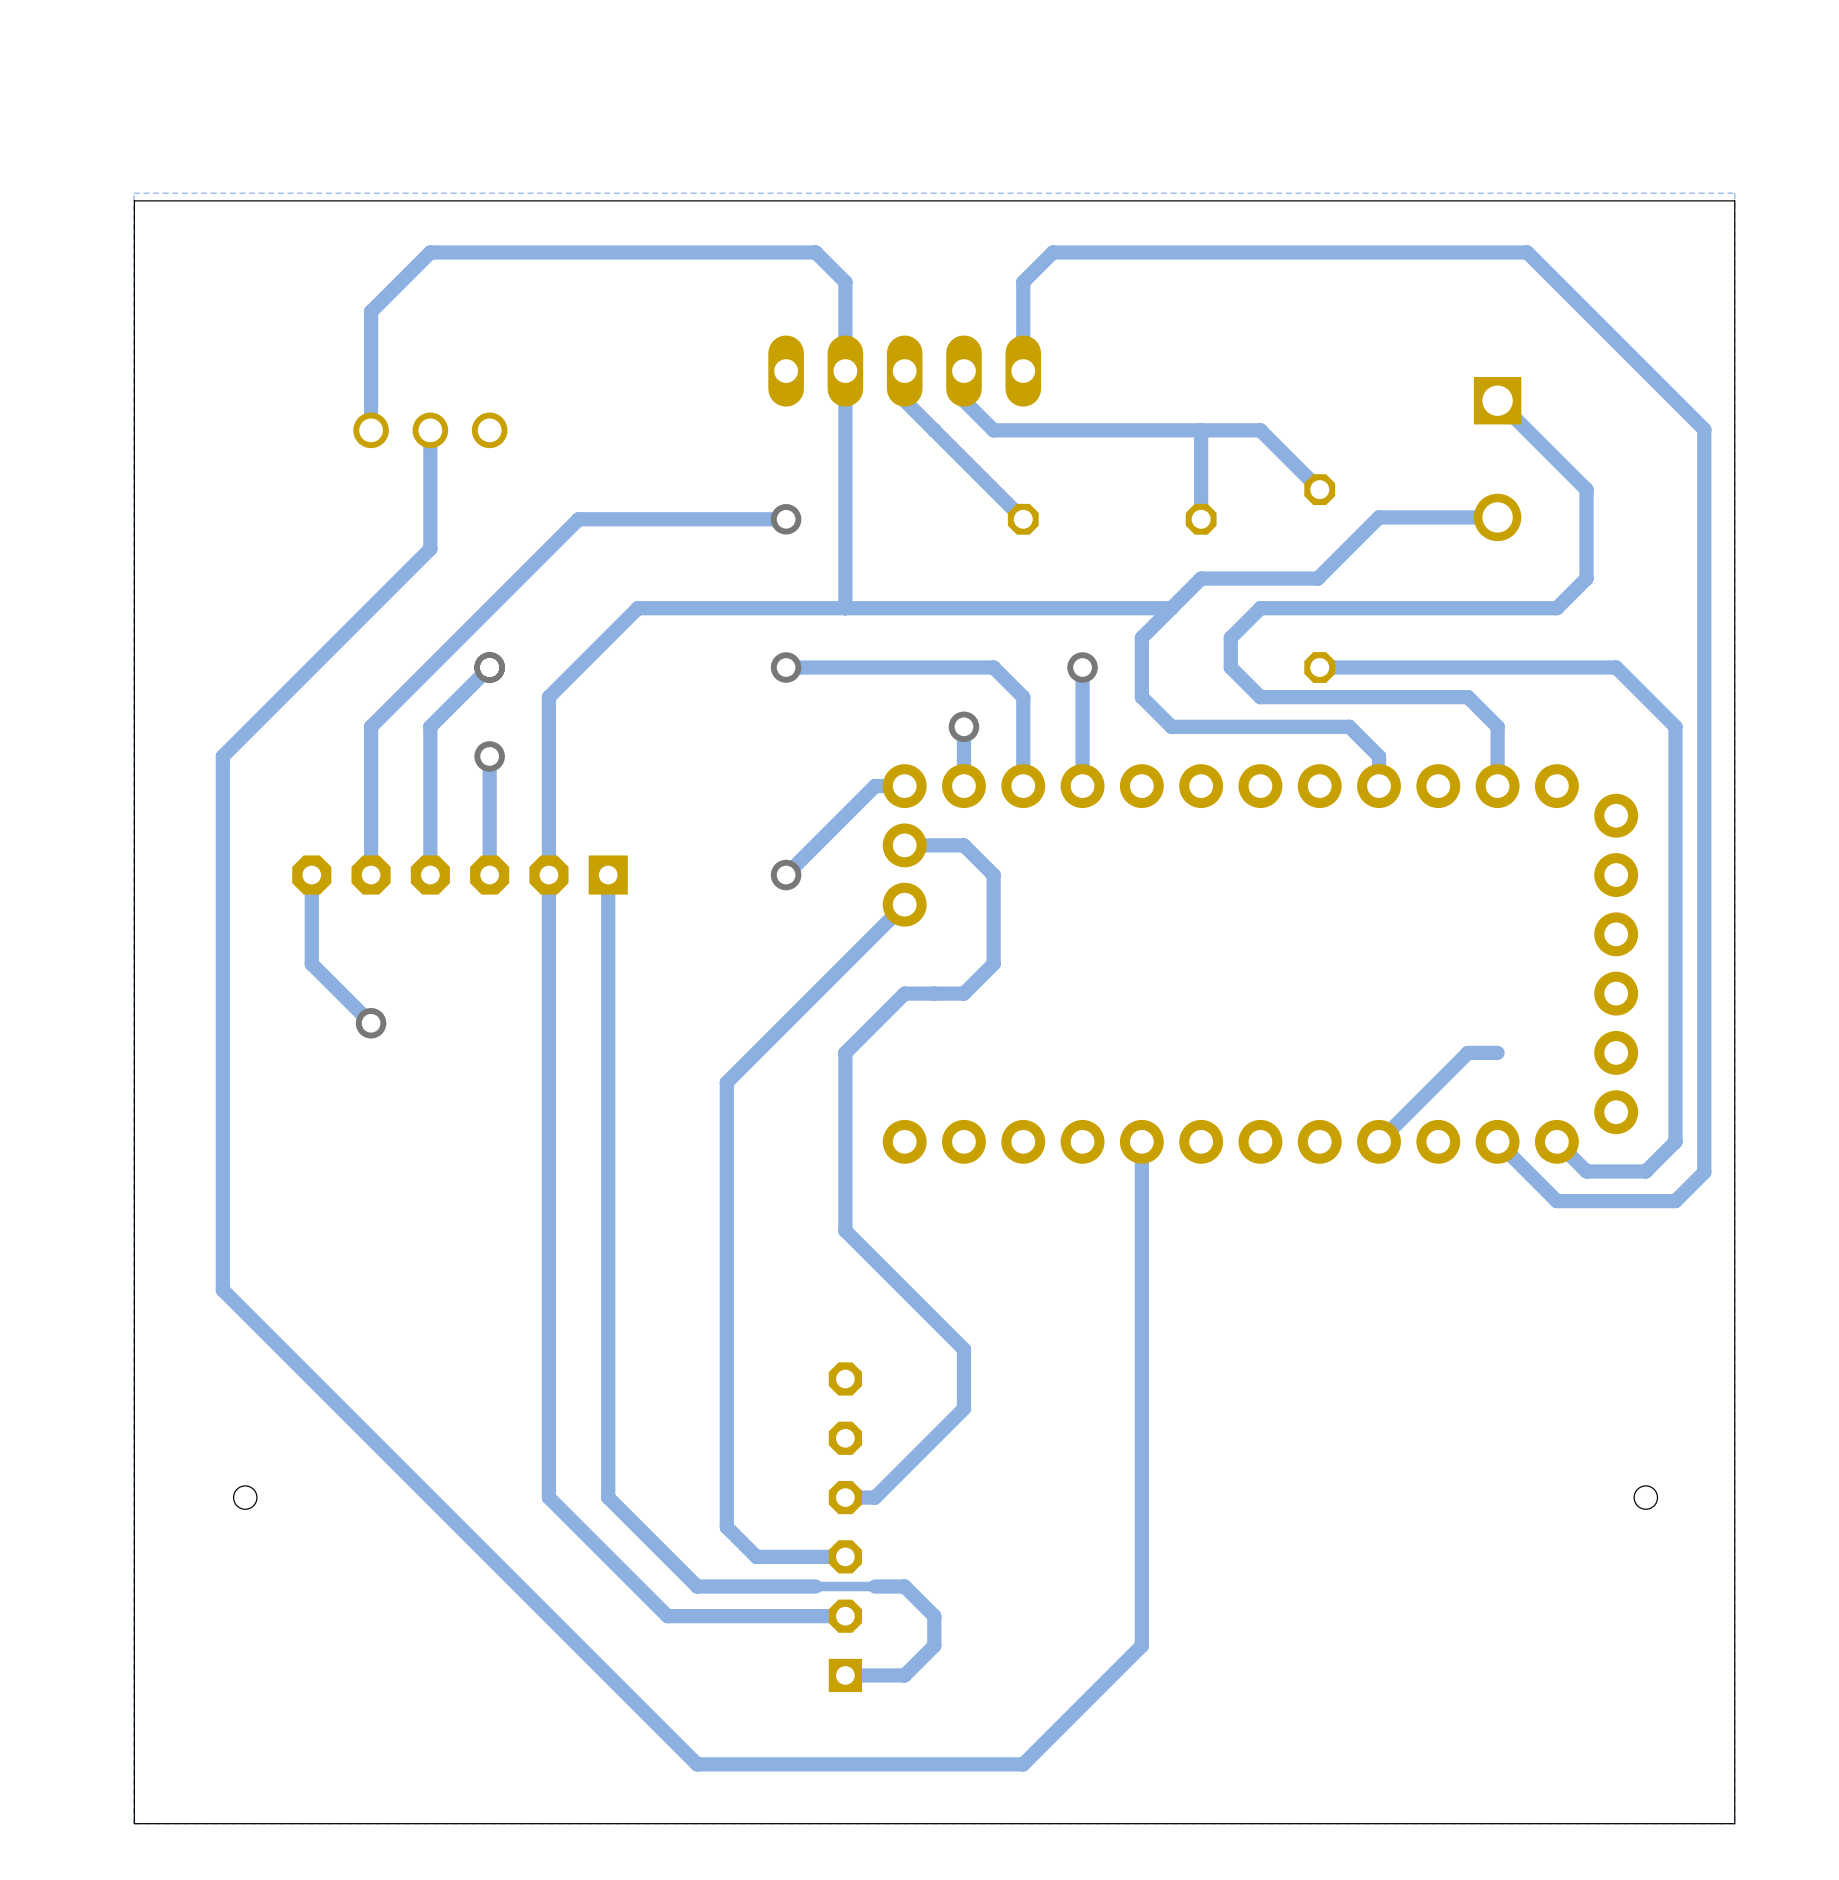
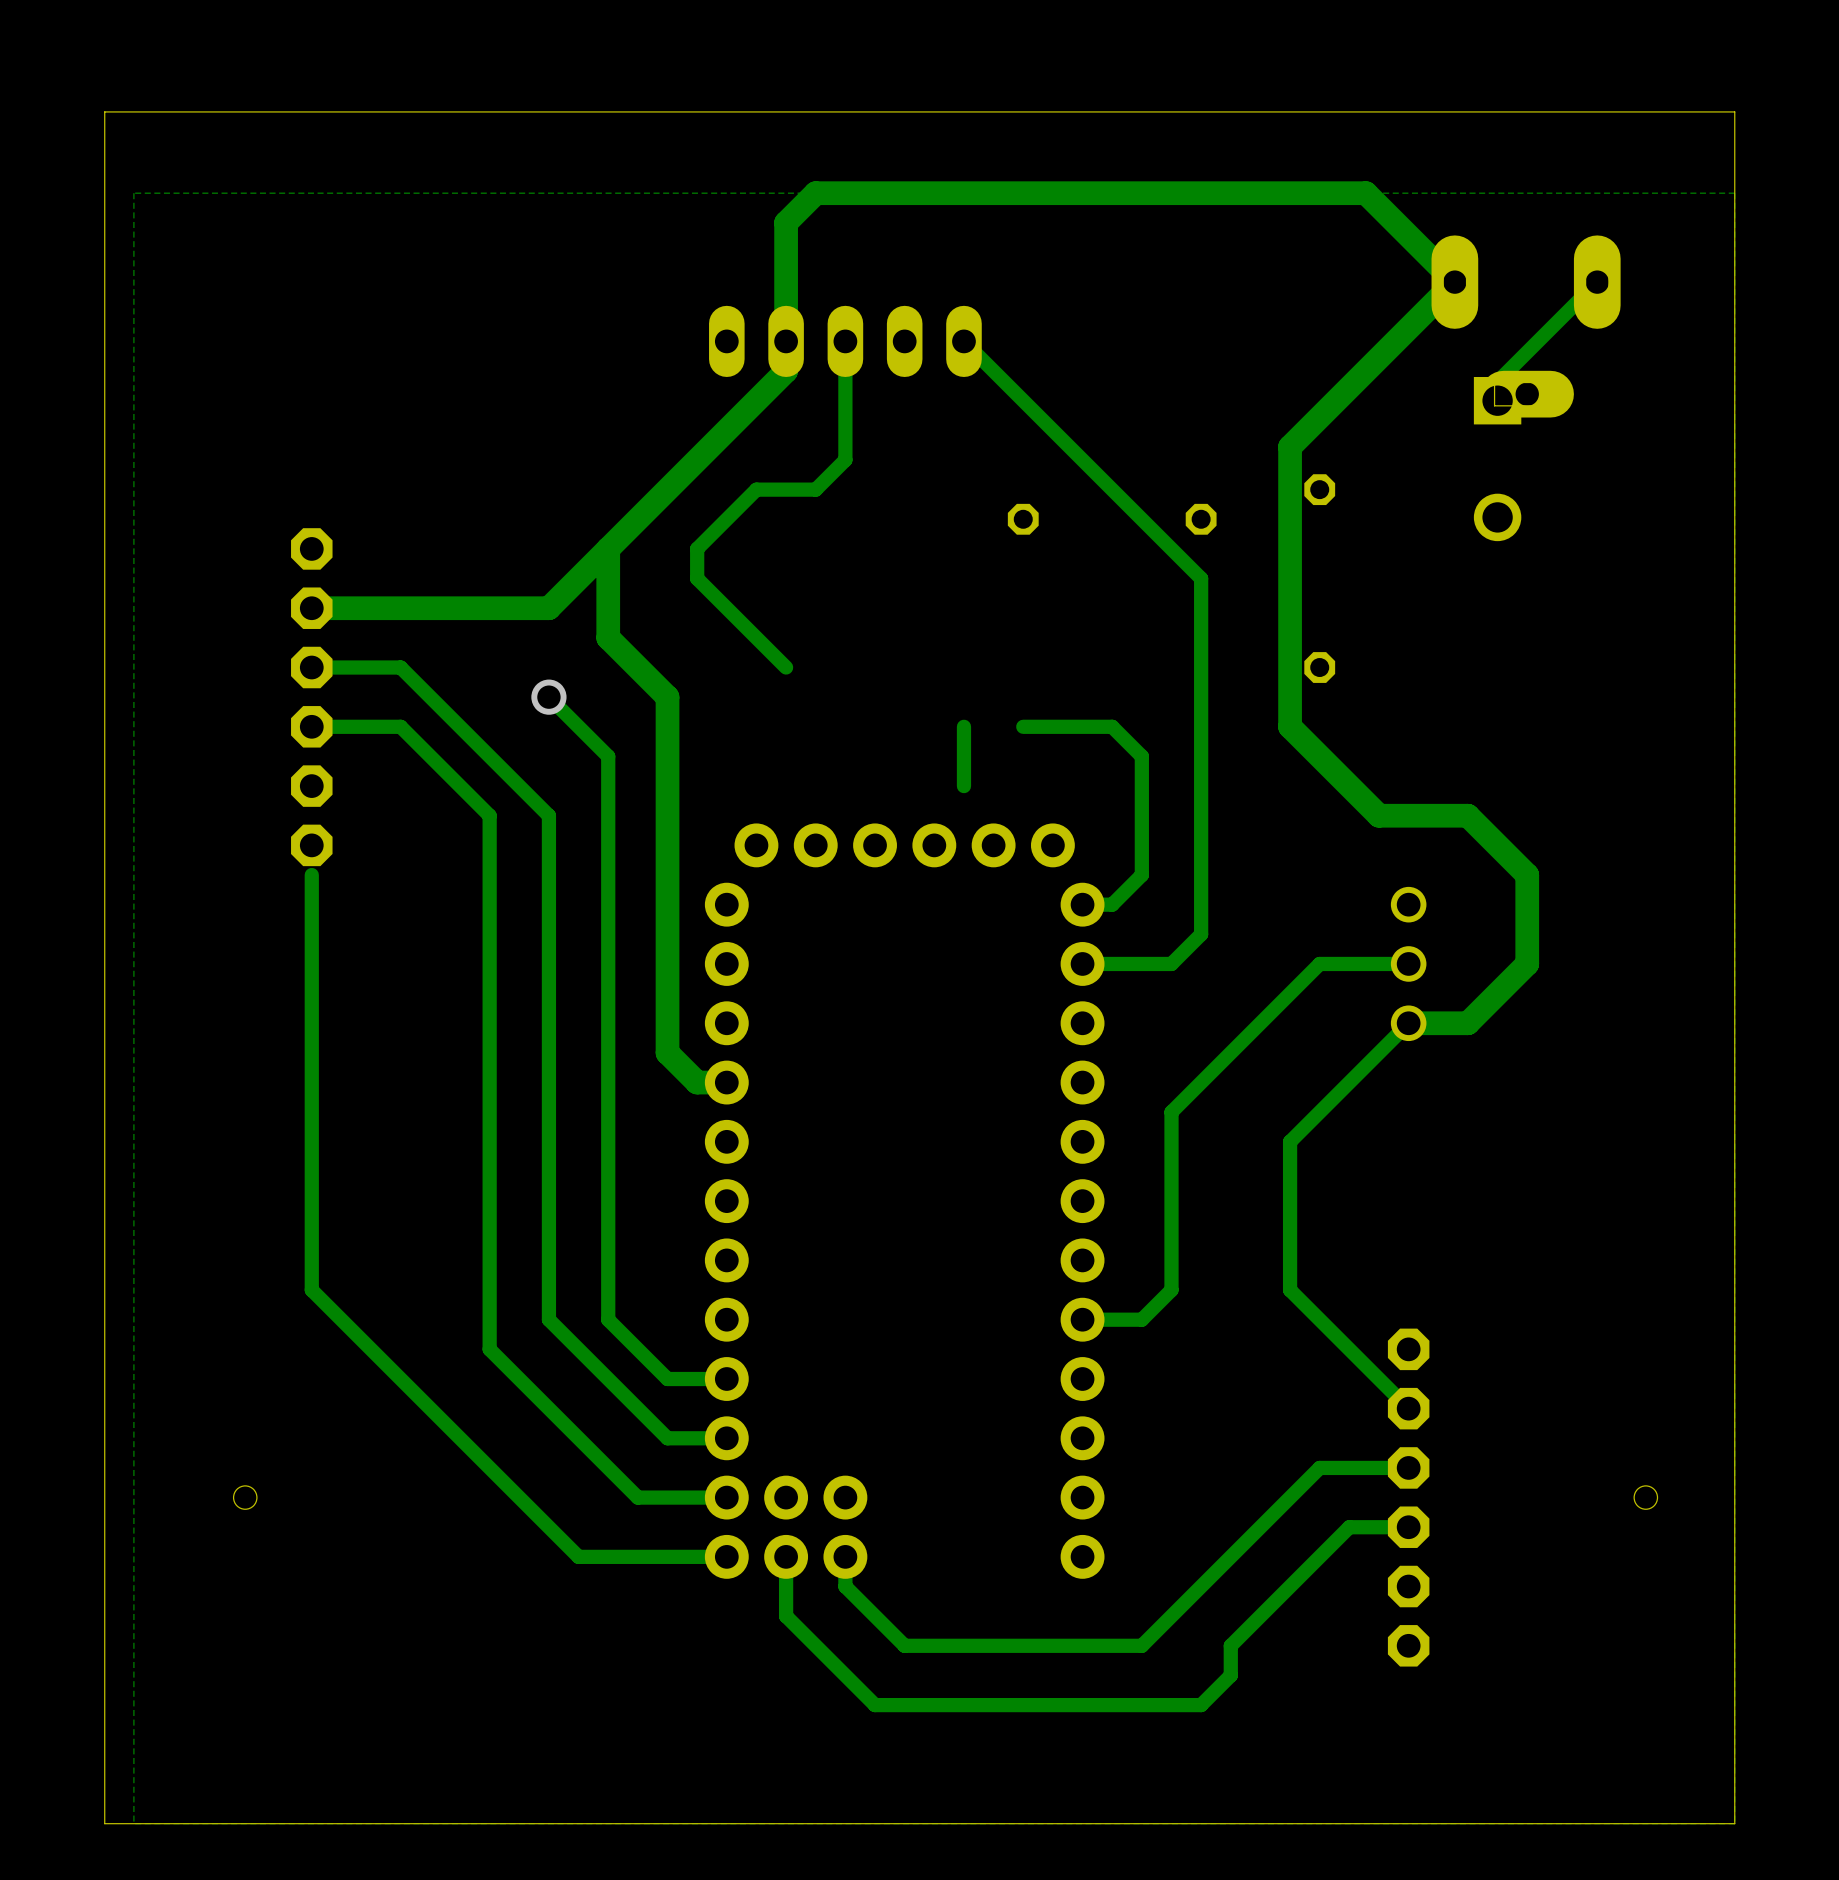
board edge: (1734, 200) (134, 200) (134, 1823) -> (1734, 200) (1734, 111) (104, 111) (104, 1823) (134, 1823)
part: none -> (1526, 326)
track: (845, 341) (845, 282) (815, 252) (430, 252) (371, 311) (371, 430) -> none
track: none -> (963, 341) (1201, 578) (1201, 934) (1171, 963) (1082, 963)
part position: (904, 371) -> (845, 341)
track: (963, 371) (963, 400) (993, 430) (1260, 430) (1319, 489) -> none
track: (1023, 371) (1023, 282) (1052, 252) (1527, 252) (1704, 429) (1704, 1172) (1675, 1201) (1556, 1201) (1497, 1141) -> none
track: (904, 400) (1023, 519) -> none
track: (1497, 400) (1586, 489) (1586, 578) (1556, 608) (1260, 608) (1230, 637) (1230, 667) (1260, 697) (1467, 697) (1497, 726) (1497, 800) -> (1497, 400) (1497, 381) (1597, 282)
track: (430, 430) (430, 548) (222, 756) (222, 1290) (697, 1764) (1023, 1764) (1141, 1645) (1141, 1141) -> none
part: (430, 430) -> none
track: (1201, 430) (1201, 519) -> none
track: (845, 459) (845, 608) -> (845, 459) (815, 489) (756, 489) (697, 548) (697, 578) (786, 667)
track: (1497, 517) (1379, 517) (1317, 578) (1201, 578) (1141, 637) (1141, 697) (1171, 726) (1349, 726) (1379, 756) (1379, 786) -> none
track: (786, 519) (578, 519) (371, 726) (371, 875) -> none
via: (786, 519) -> none
track: none -> (608, 548) (608, 637) (667, 697) (667, 1052) (697, 1082) (726, 1082)
track: none -> (519, 608) (311, 608) (548, 608) (786, 371) (786, 222) (815, 193) (1365, 193) (1454, 282) (1290, 446) (1290, 726) (1379, 815) (1467, 815) (1527, 875) (1527, 963) (1467, 1023) (1408, 1023) (1290, 1141) (1290, 1290) (1408, 1408)
track: (1171, 608) (637, 608) (548, 697) (548, 815) -> (311, 667) (400, 667) (548, 815)
track: (489, 667) (430, 726) (430, 875) -> none
via: (489, 667) -> none
track: (786, 667) (993, 667) (1023, 697) (1023, 786) -> none
via: (786, 667) -> none
track: (1082, 667) (1082, 786) -> none
via: (1082, 667) -> none
track: (1319, 667) (1616, 667) (1675, 726) (1675, 1141) (1645, 1171) (1586, 1171) (1556, 1141) -> none
part: none -> (311, 697)
track: none -> (548, 697) (608, 756) (608, 875)
via: none -> (548, 697)
via: (963, 726) -> none
track: none -> (1023, 726) (1112, 726) (1141, 756) (1141, 875) (1112, 904) (1082, 904)
track: (489, 756) (489, 815) -> (311, 726) (400, 726) (489, 815)
via: (489, 756) -> none
track: (904, 786) (875, 786) (786, 875) -> none
track: (904, 845) (963, 845) (993, 875) (993, 963) (963, 993) (904, 993) (845, 1052) (845, 1230) (963, 1349) (963, 1408) (875, 1497) (845, 1497) -> none
part: (460, 875) -> none
track: none -> (489, 875) (489, 1349) (637, 1497) (726, 1497)
via: (786, 875) -> none
track: (904, 904) (726, 1082) (726, 1527) (756, 1556) (845, 1556) -> (1408, 1467) (1319, 1467) (1141, 1645) (904, 1645) (845, 1586) (845, 1556)
track: (311, 963) (371, 1023) -> (311, 963) (311, 1290) (578, 1556) (726, 1556)
part: (1260, 963) -> none
track: none -> (1408, 963) (1319, 963) (1171, 1112) (1171, 1290) (1141, 1319) (1082, 1319)
part: none -> (1408, 963)
via: (371, 1023) -> none
track: (1497, 1052) (1467, 1052) (1379, 1141) -> none
part: none -> (904, 1201)
track: (548, 1319) (548, 1497) (667, 1616) (845, 1616) -> (548, 1319) (667, 1438) (726, 1438)
track: (608, 1319) (608, 1497) (697, 1586) (904, 1586) (934, 1616) (934, 1645) (904, 1675) (845, 1675) -> (608, 1319) (667, 1379) (726, 1379)
part: none -> (1408, 1497)
part: (845, 1527) -> none
track: none -> (1408, 1527) (1349, 1527) (1230, 1645) (1230, 1675) (1201, 1705) (875, 1705) (786, 1616) (786, 1556)

